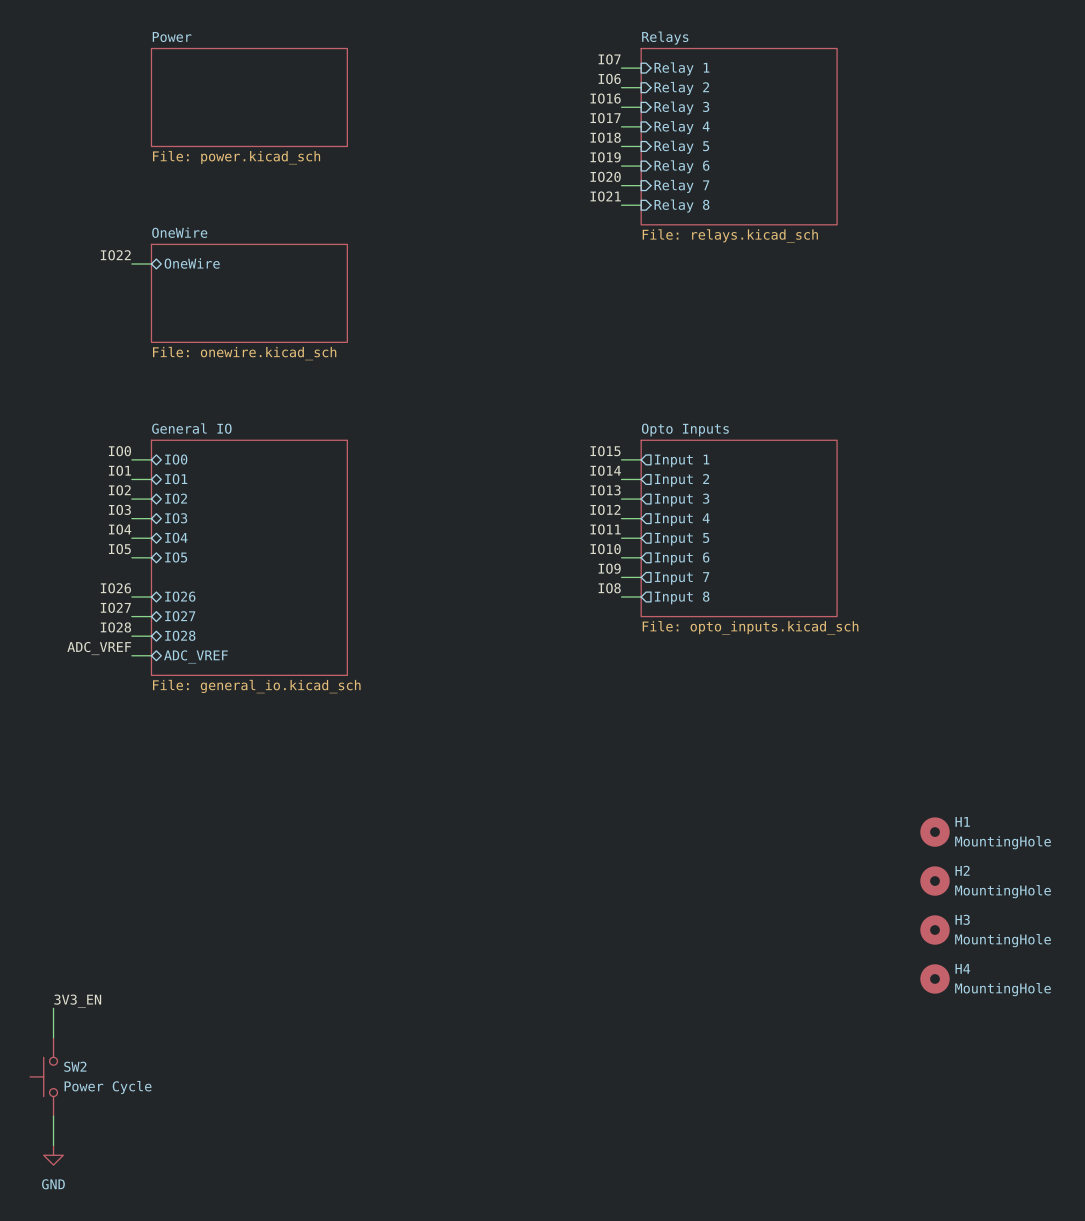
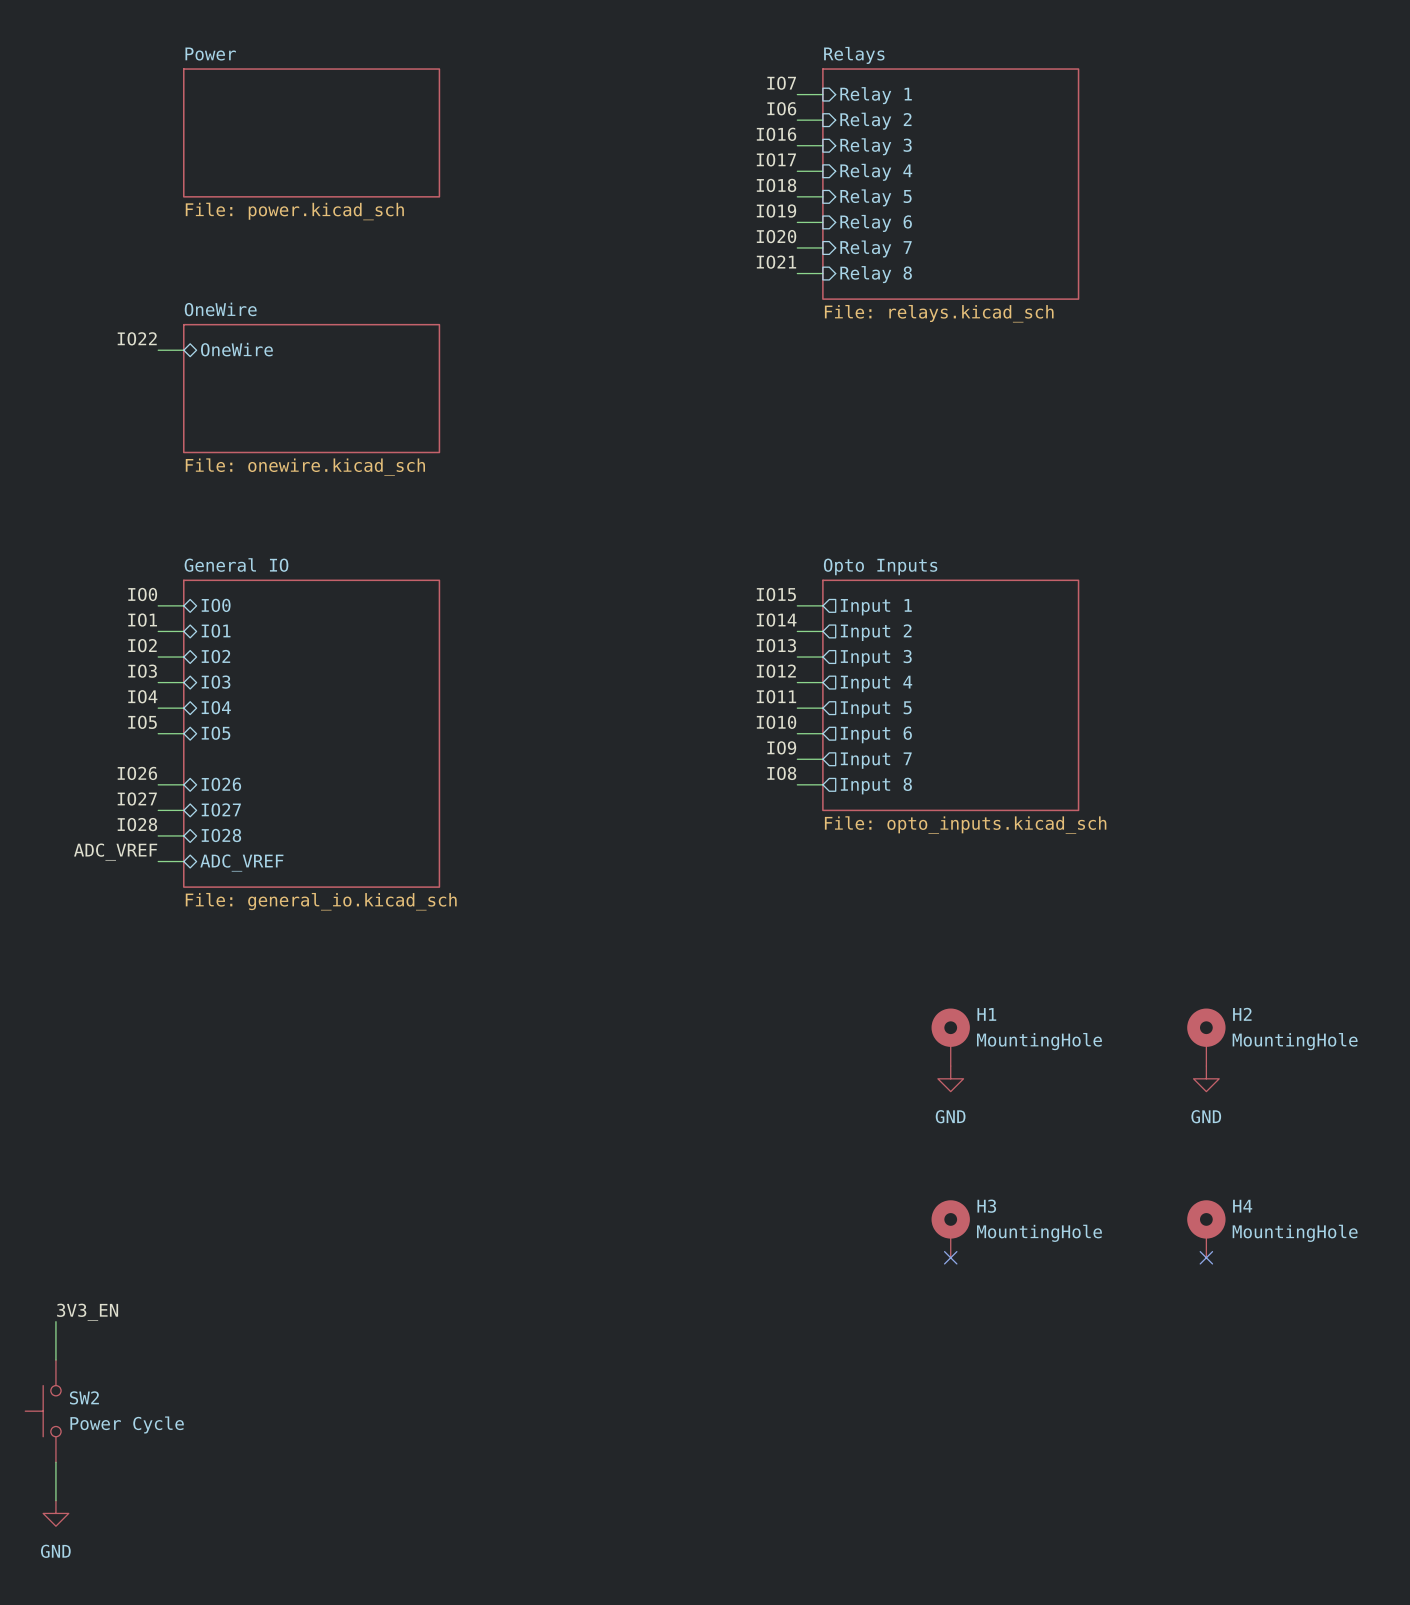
H1 symbol: [920, 817, 950, 847] -> [931, 1008, 970, 1067]
power symbol: none -> GND (950, 1078)
power symbol: none -> GND (1206, 1078)
H2 symbol: [920, 866, 950, 896] -> [1187, 1008, 1226, 1067]
H3 symbol: [920, 915, 950, 945] -> [931, 1200, 970, 1258]
no-connect mark: none -> (950, 1257)
no-connect mark: none -> (1206, 1257)
H4 symbol: [920, 964, 950, 994] -> [1187, 1200, 1226, 1258]

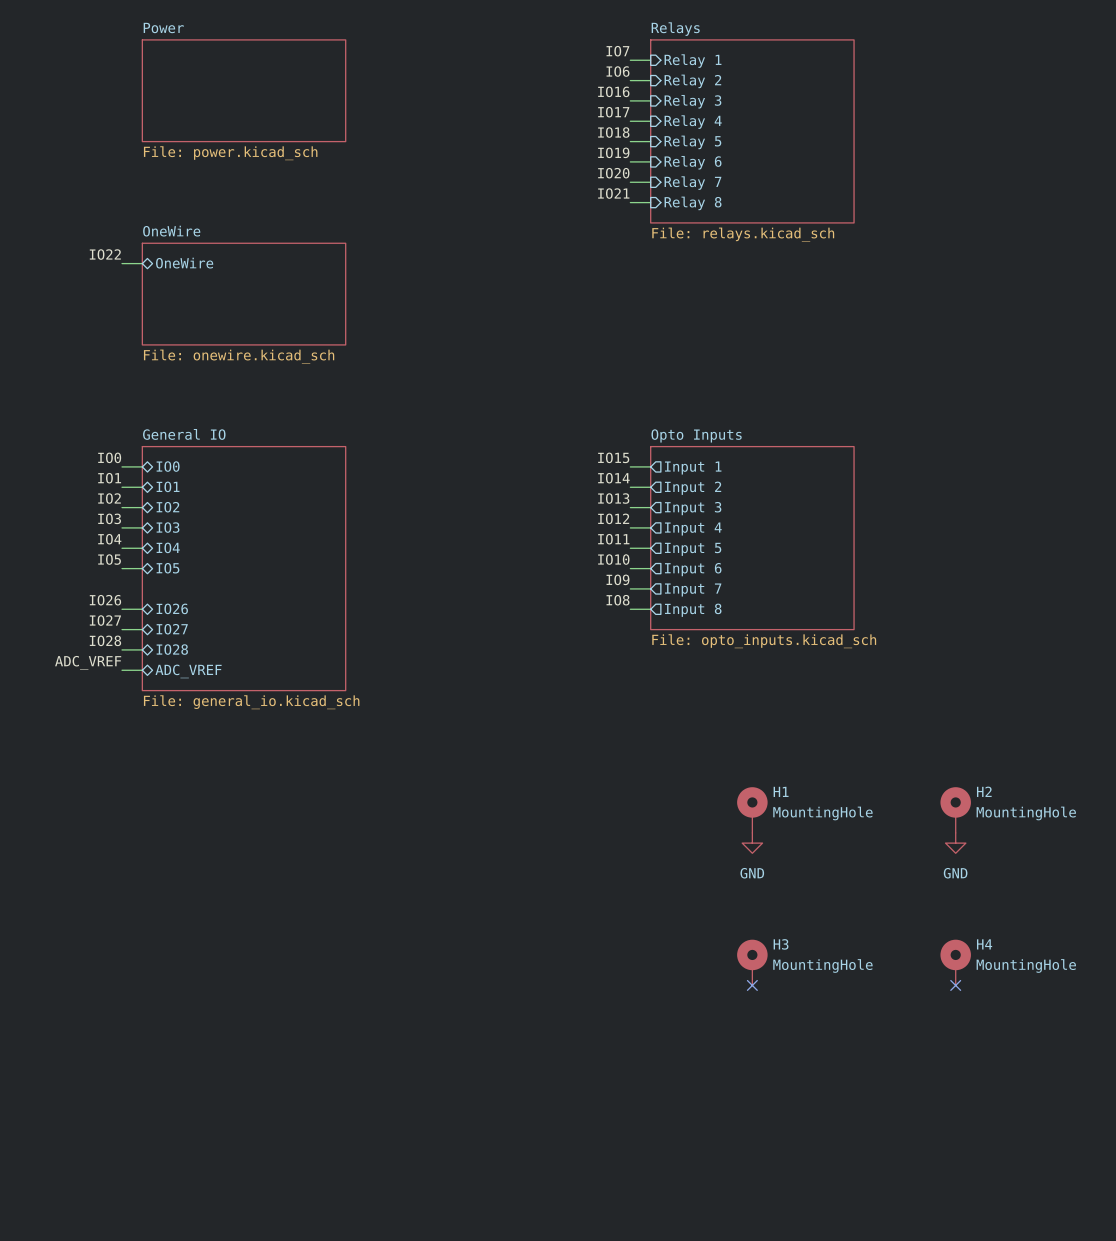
label: 3V3_EN (87, 1312) -> none
wire: (55, 1321) (55, 1360) -> none
SW2: Power Cycle (43, 1411) -> none
wire: (55, 1462) (55, 1500) -> none
power symbol: GND (55, 1513) -> none

